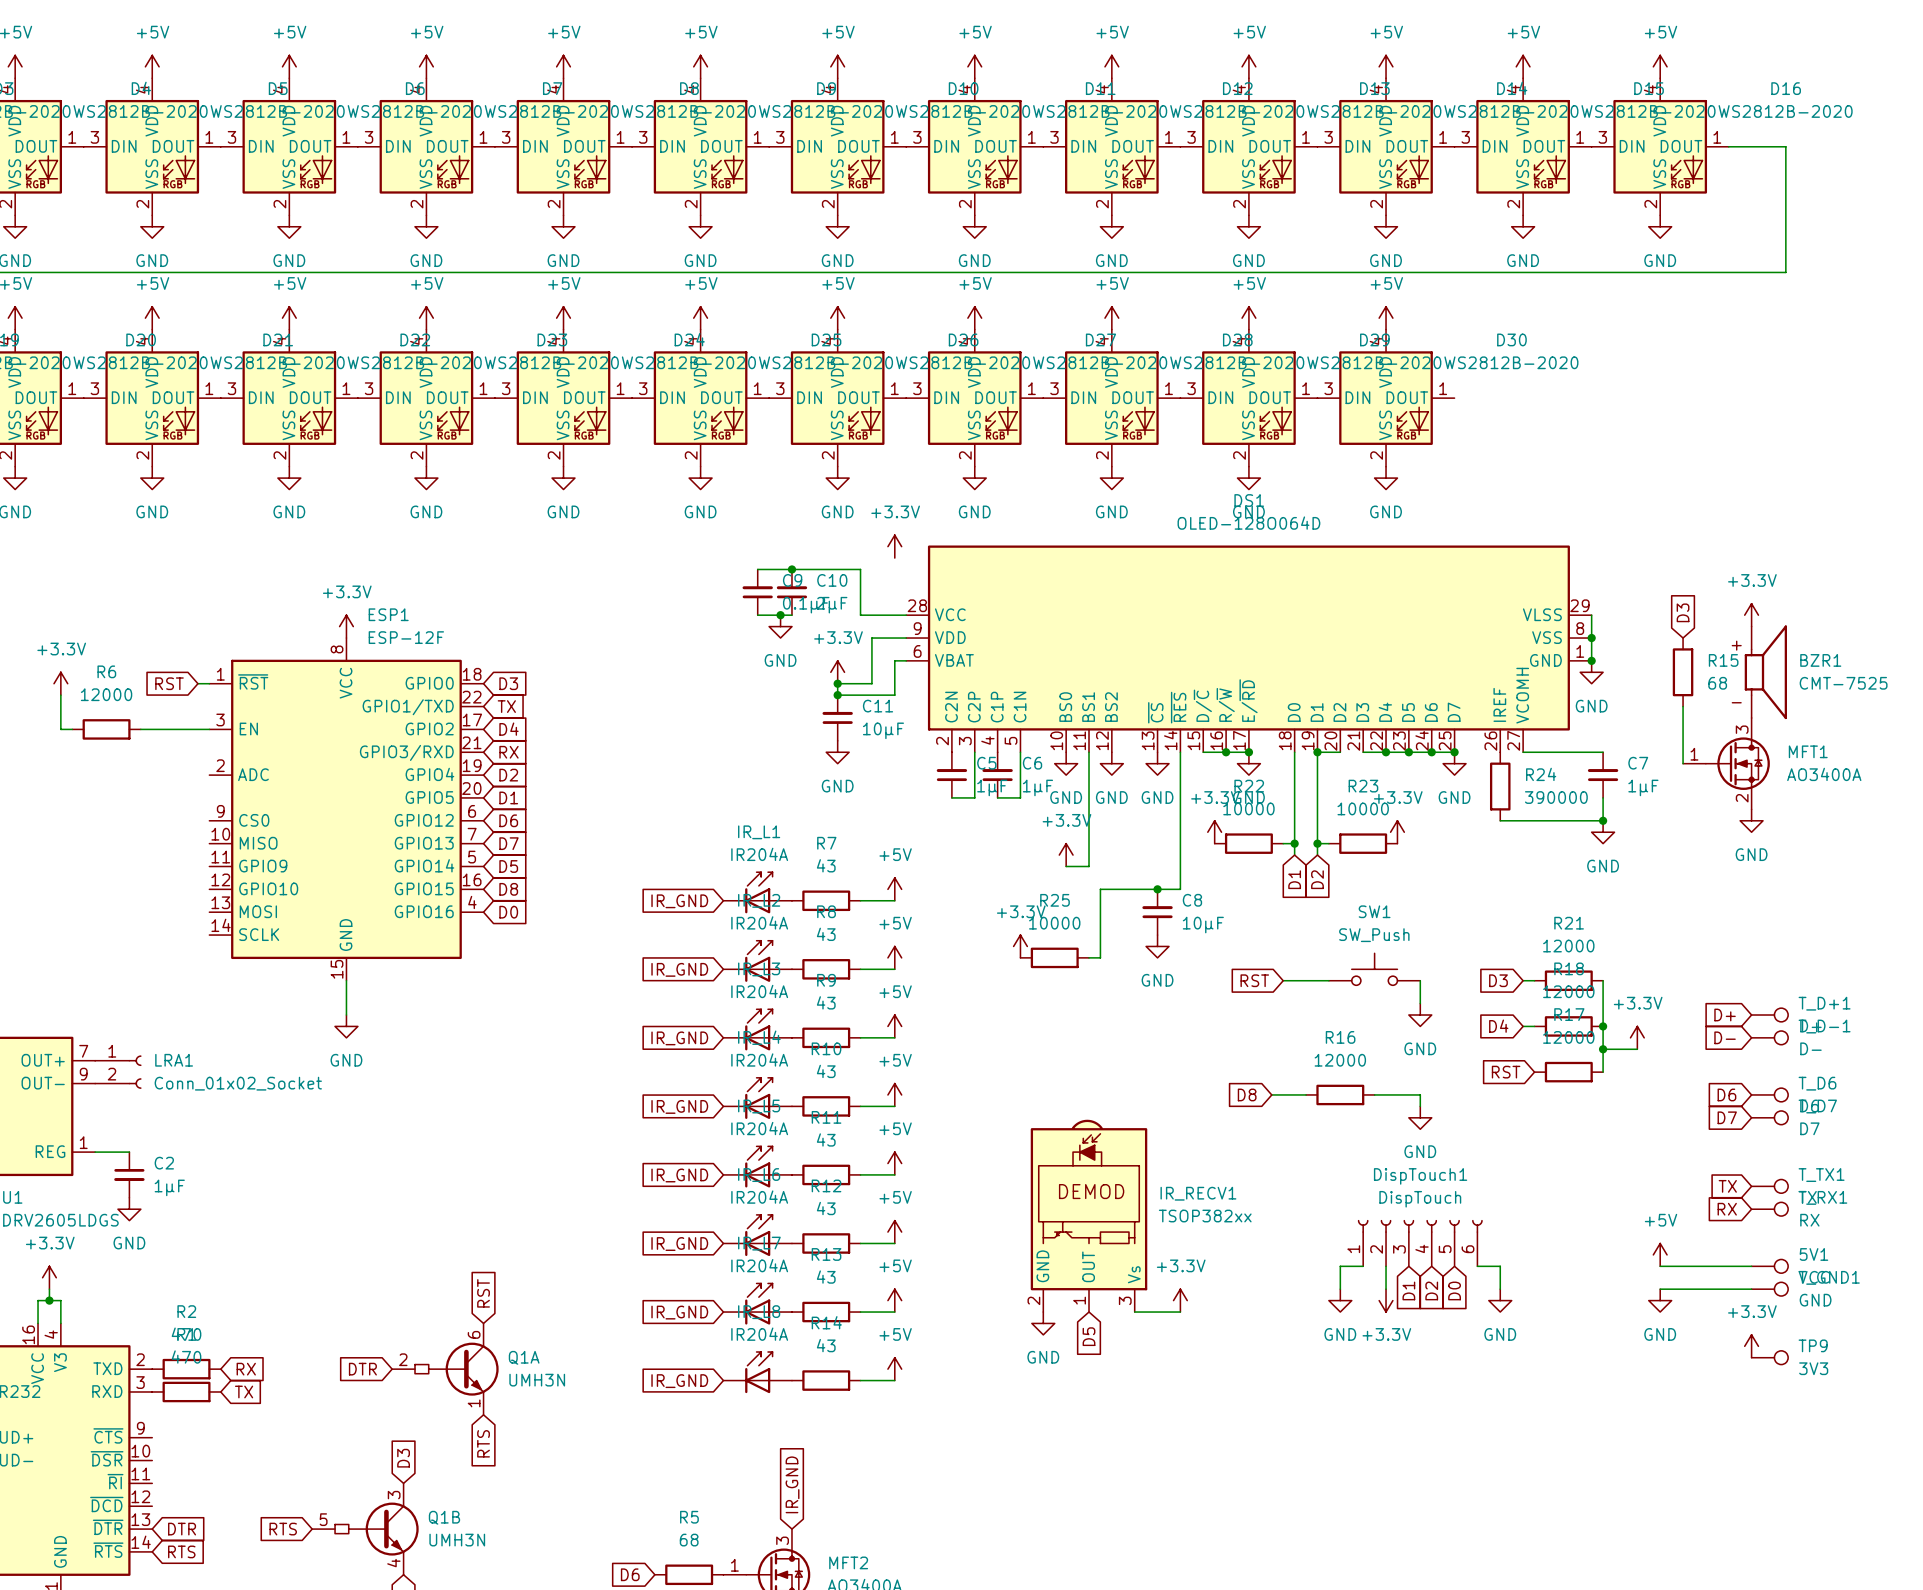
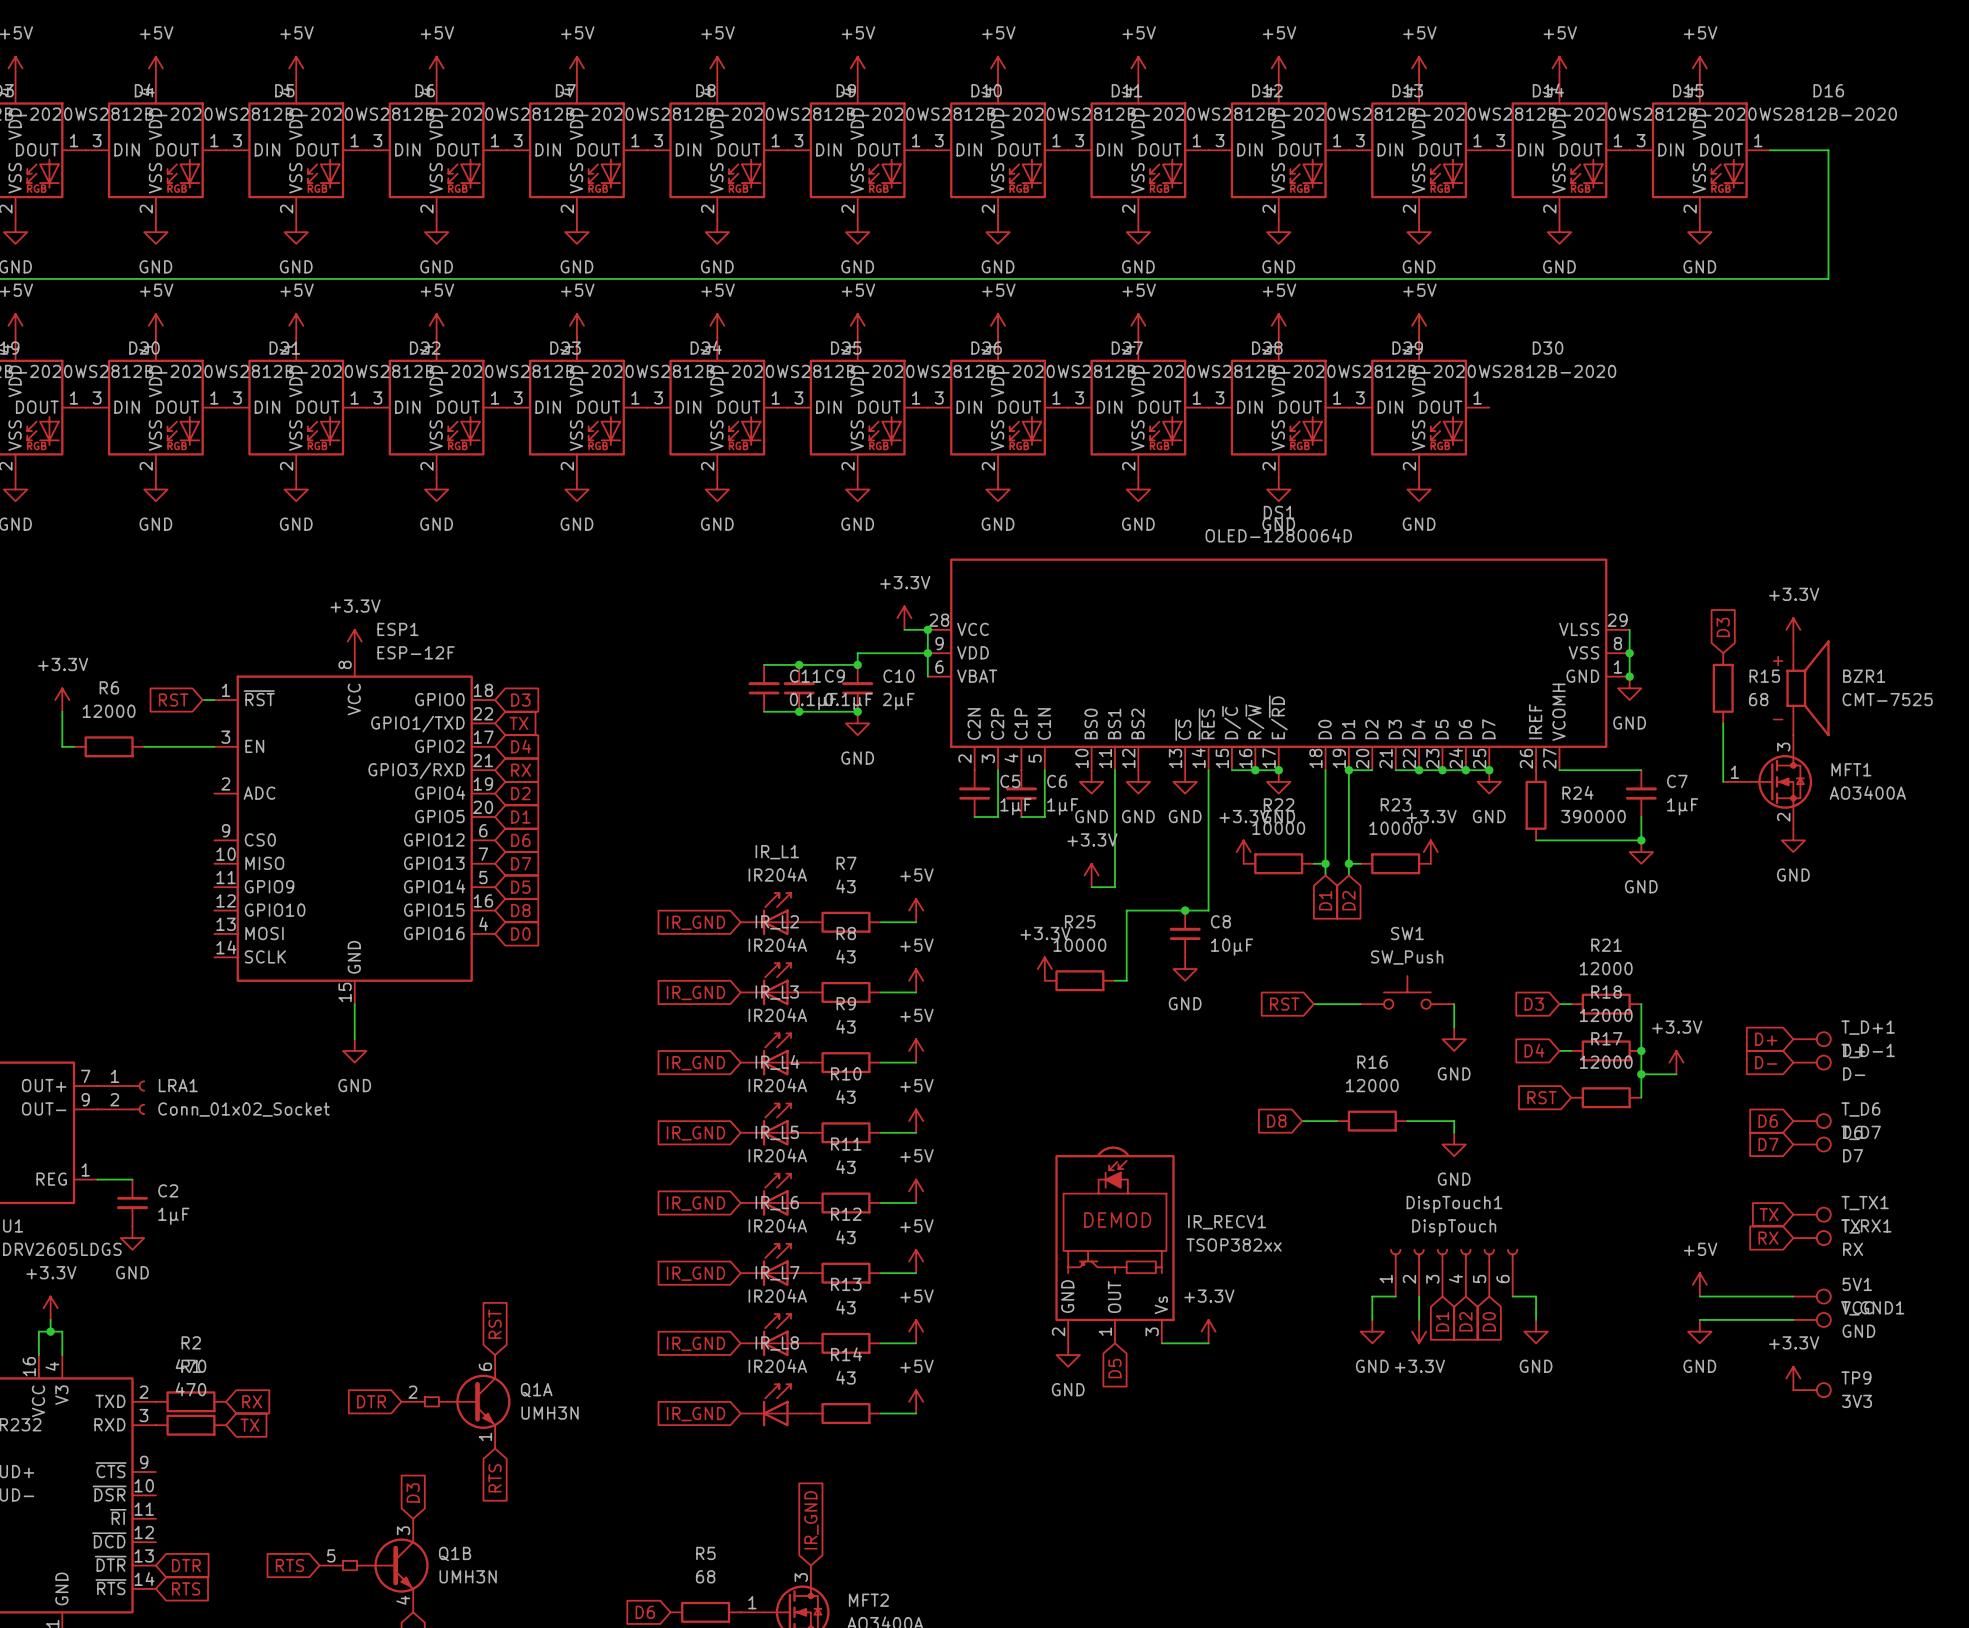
power symbol: +3.3V (894, 546) -> none
wire: (757, 569) (860, 569) (860, 615) (883, 615) -> none
junction: (791, 569) -> none
C9 position: (757, 592) -> (799, 688)
C10 position: (791, 592) -> (857, 688)
power symbol: none -> +3.3V (904, 618)
wire: (757, 615) (791, 615) -> none
junction: (780, 615) -> none
junction: none -> (927, 629)
power symbol: GND (780, 626) -> none
wire: (871, 638) (871, 683) (837, 683) (837, 695) (894, 695) (894, 660) (906, 660) -> (927, 629) (927, 676)
wire: none -> (892, 653) (857, 653) (857, 664) (764, 664)
junction: none -> (927, 653)
junction: none -> (799, 664)
junction: none -> (857, 664)
power symbol: +3.3V (837, 672) -> none
junction: (837, 683) -> none
wire: none -> (764, 711) (857, 711)
junction: none -> (799, 711)
C11 position: (837, 717) -> (764, 688)
C11 value: 10µF (883, 730) -> 0.1µF (813, 701)
power symbol position: GND (837, 752) -> GND (857, 723)

